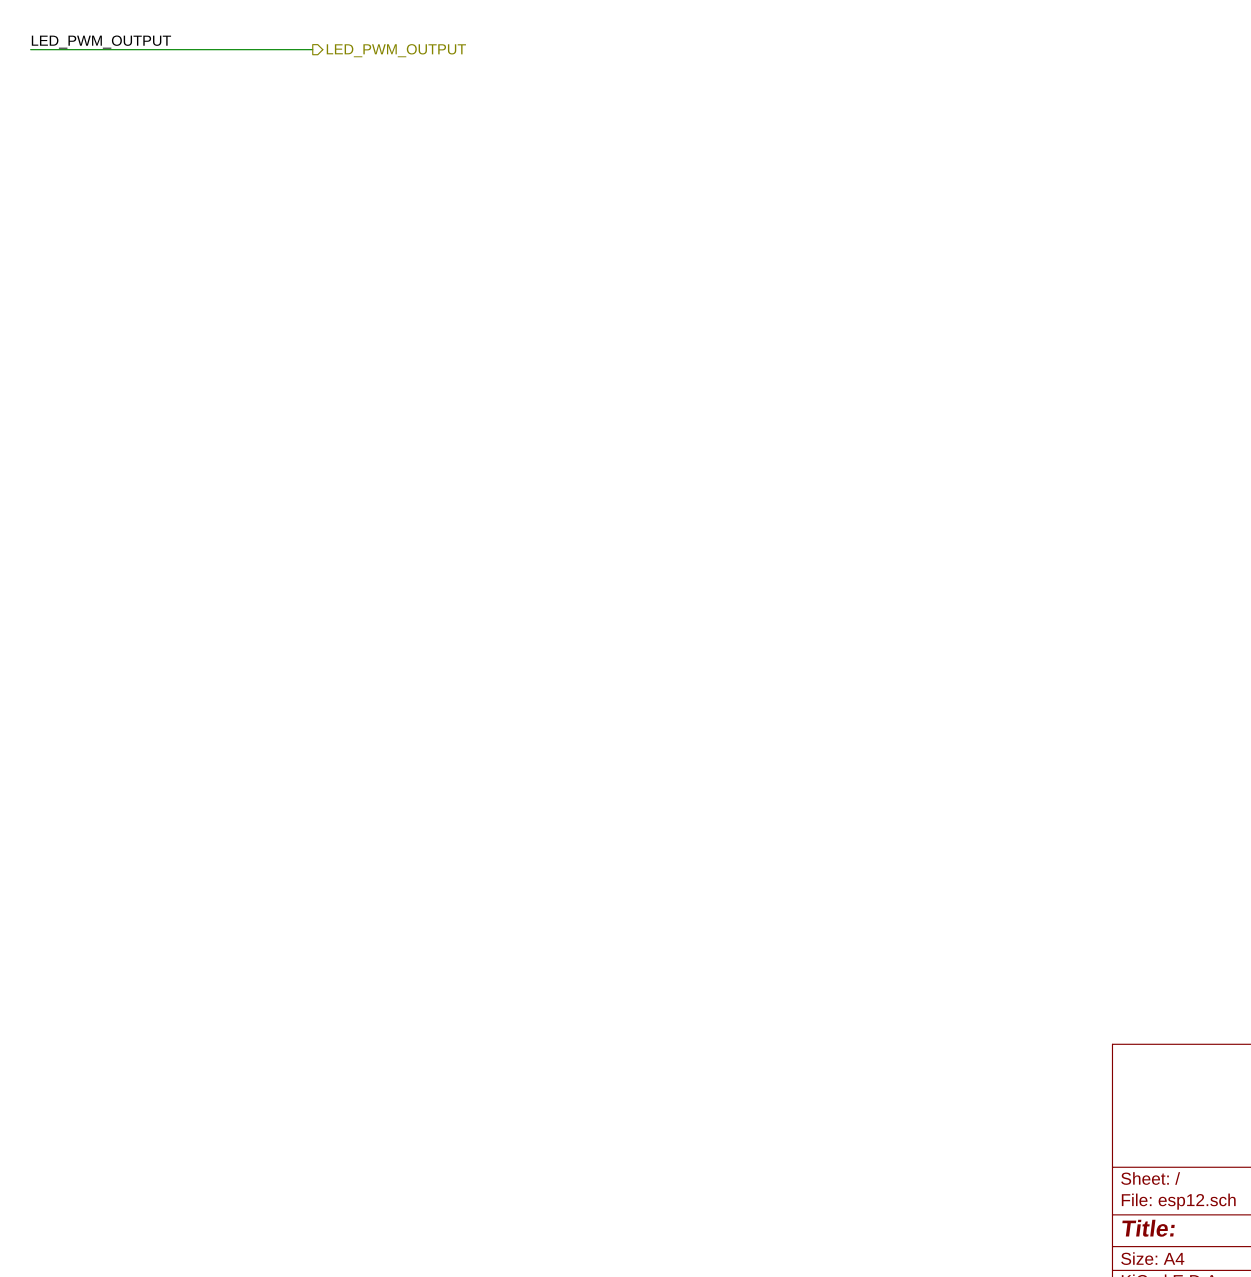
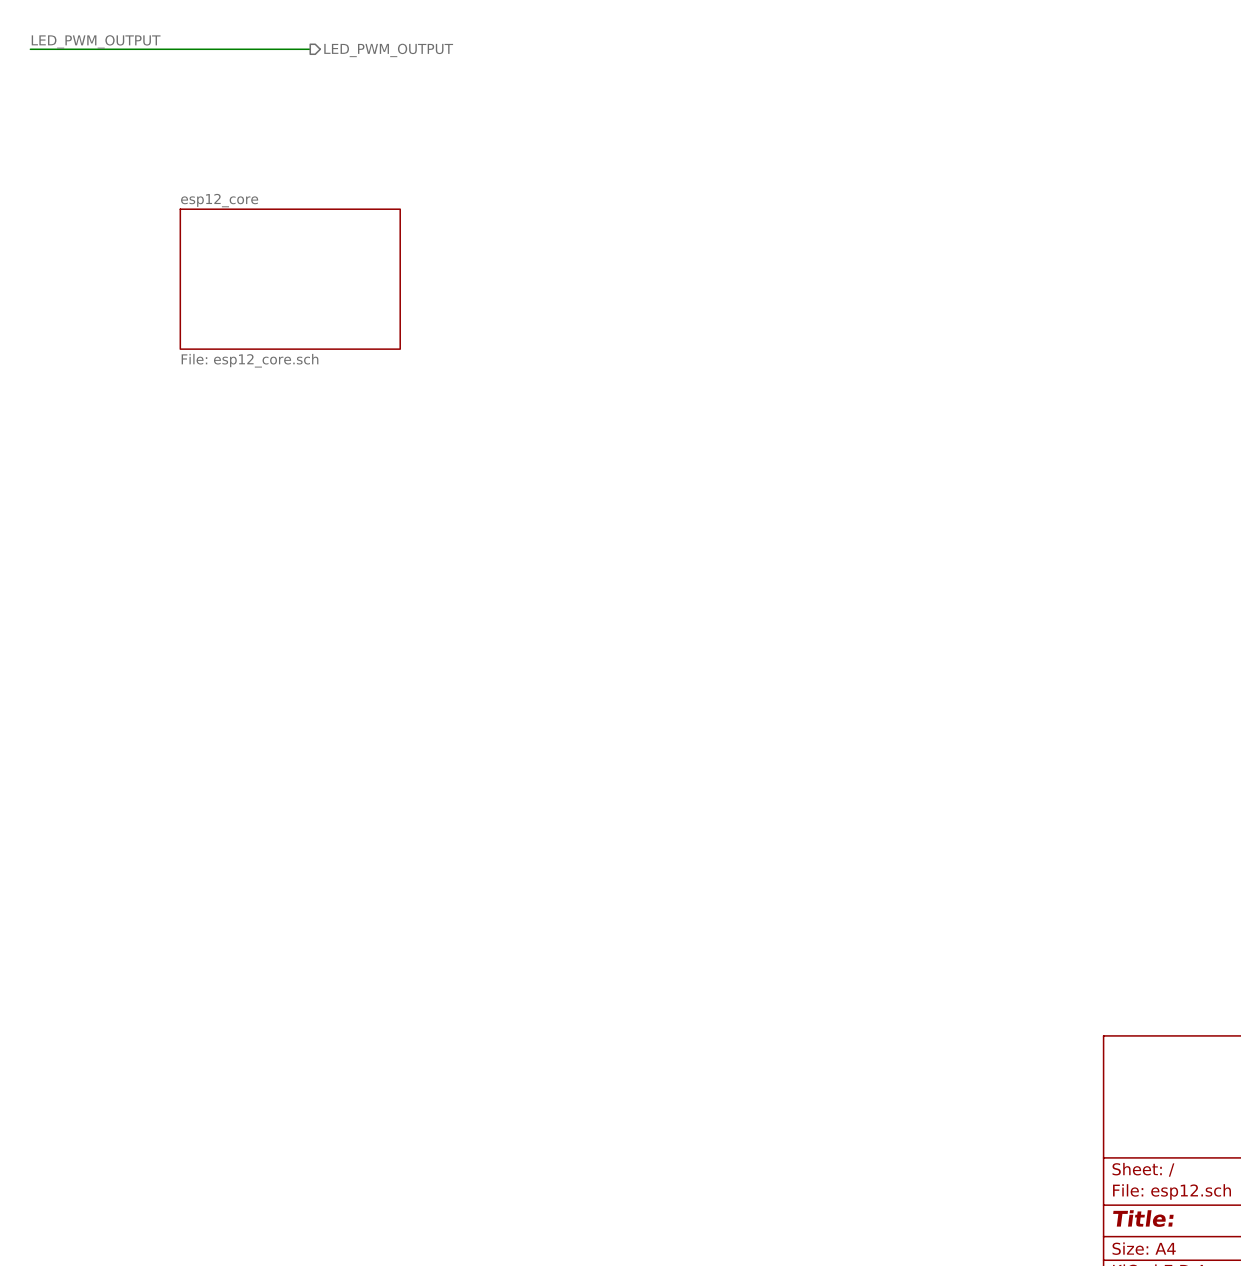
sheet esp12_core: none -> File: esp12_core.sch (290, 279)

